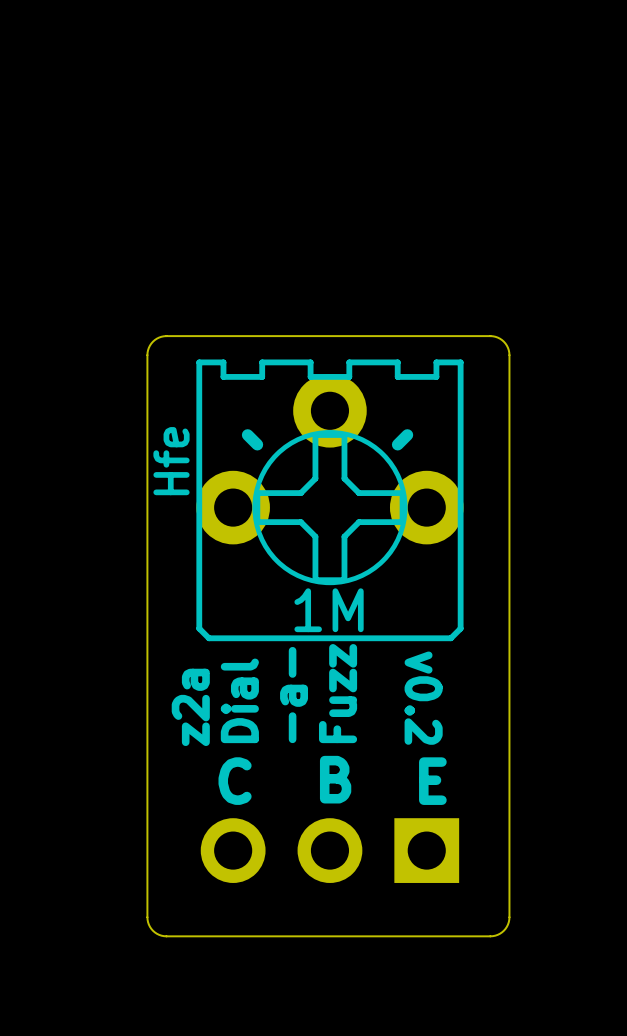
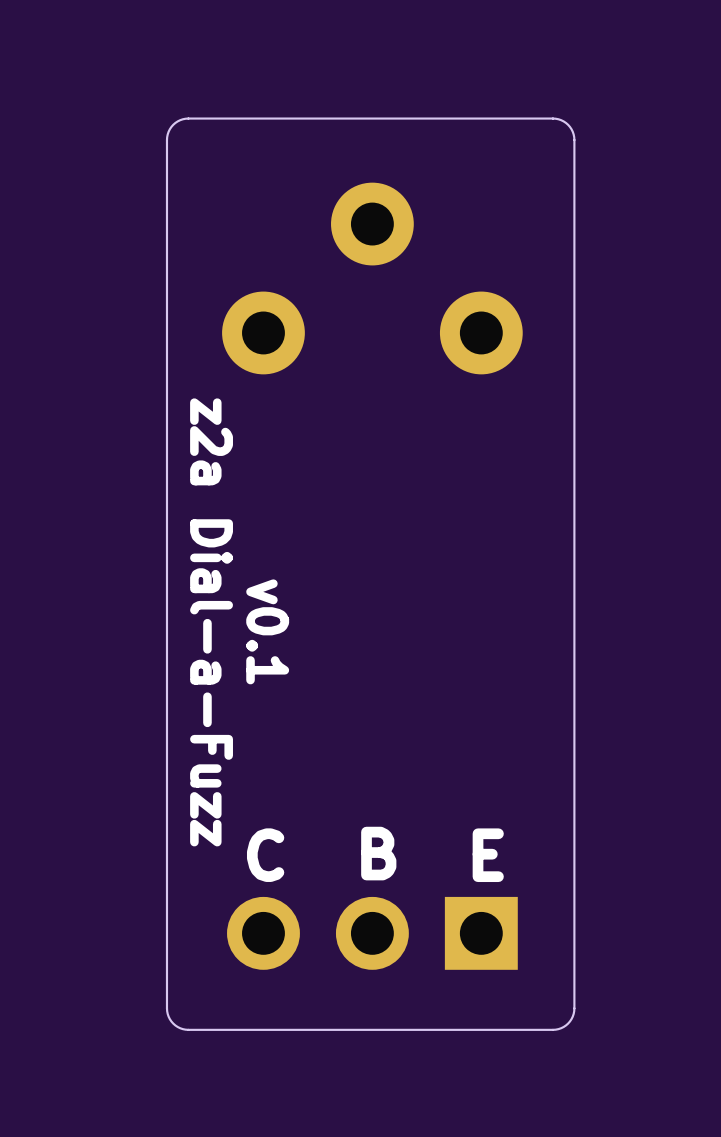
board edge: (509, 355) (503, 341) (490, 336) (166, 336) (152, 341) (147, 355) -> (574, 375) (574, 137) (568, 124) (561, 120) (552, 118) (188, 118) (177, 121) (169, 129) (166, 139) (166, 375)
part side: bottom (329, 500) -> top (372, 278)
text: none -> z2a Dial-a-Fuzz (211, 622)
text: none -> v0.1 (267, 631)
text: Fuzz (338, 693) -> none
text: -a- (294, 695) -> none
text: v0.2 (423, 698) -> none
text: Dial (239, 700) -> none
text: z2a (190, 707) -> none

